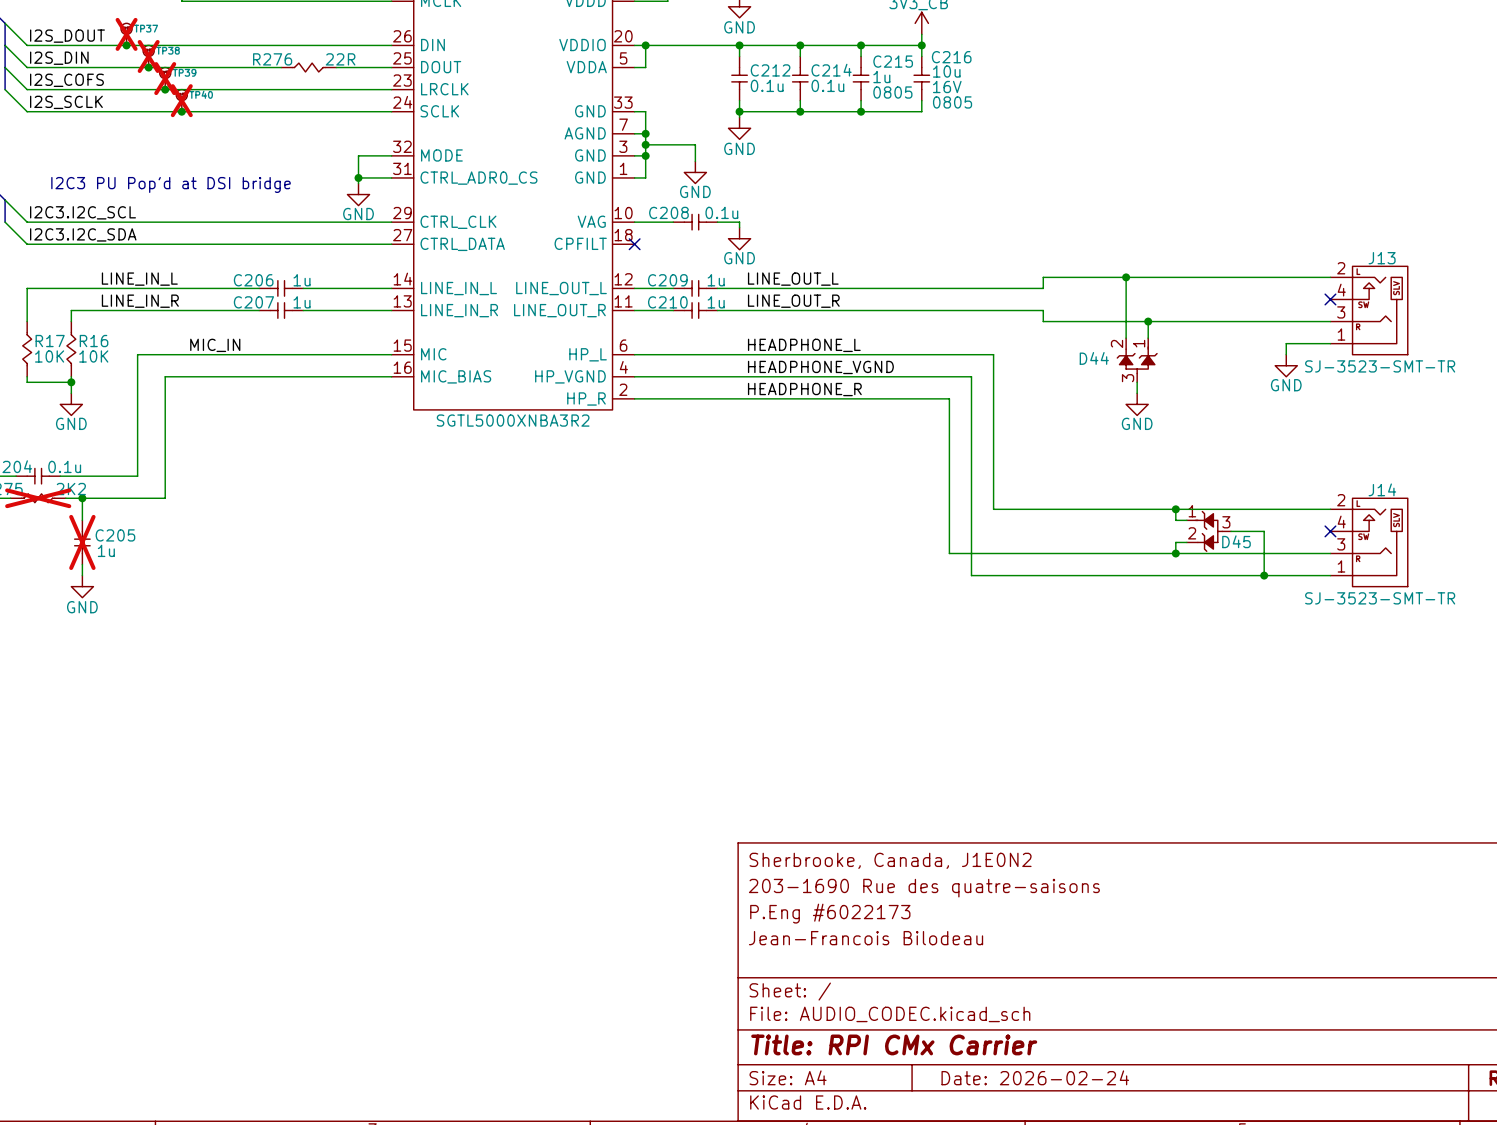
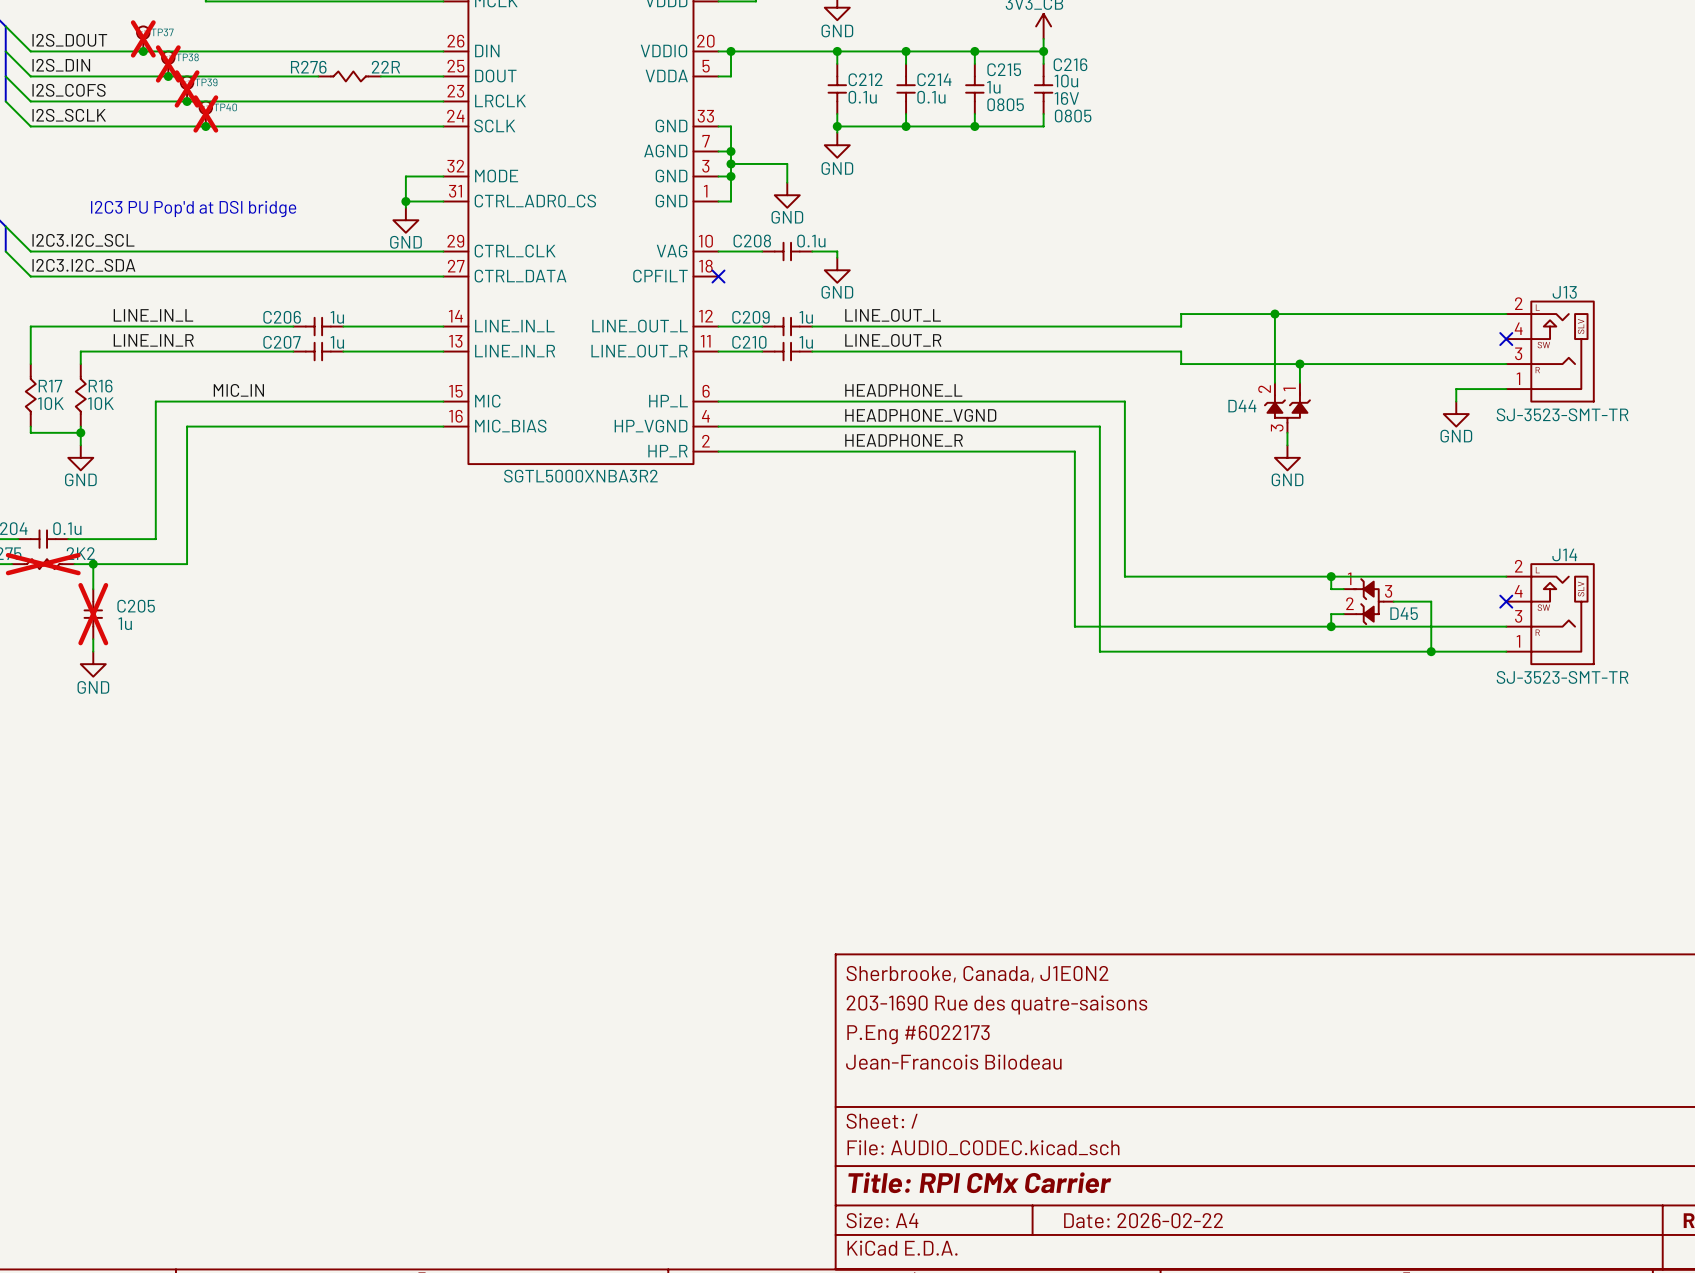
title block: Date: 2026-02-24 (1035, 1077) -> Date: 2026-02-22 (1143, 1220)

